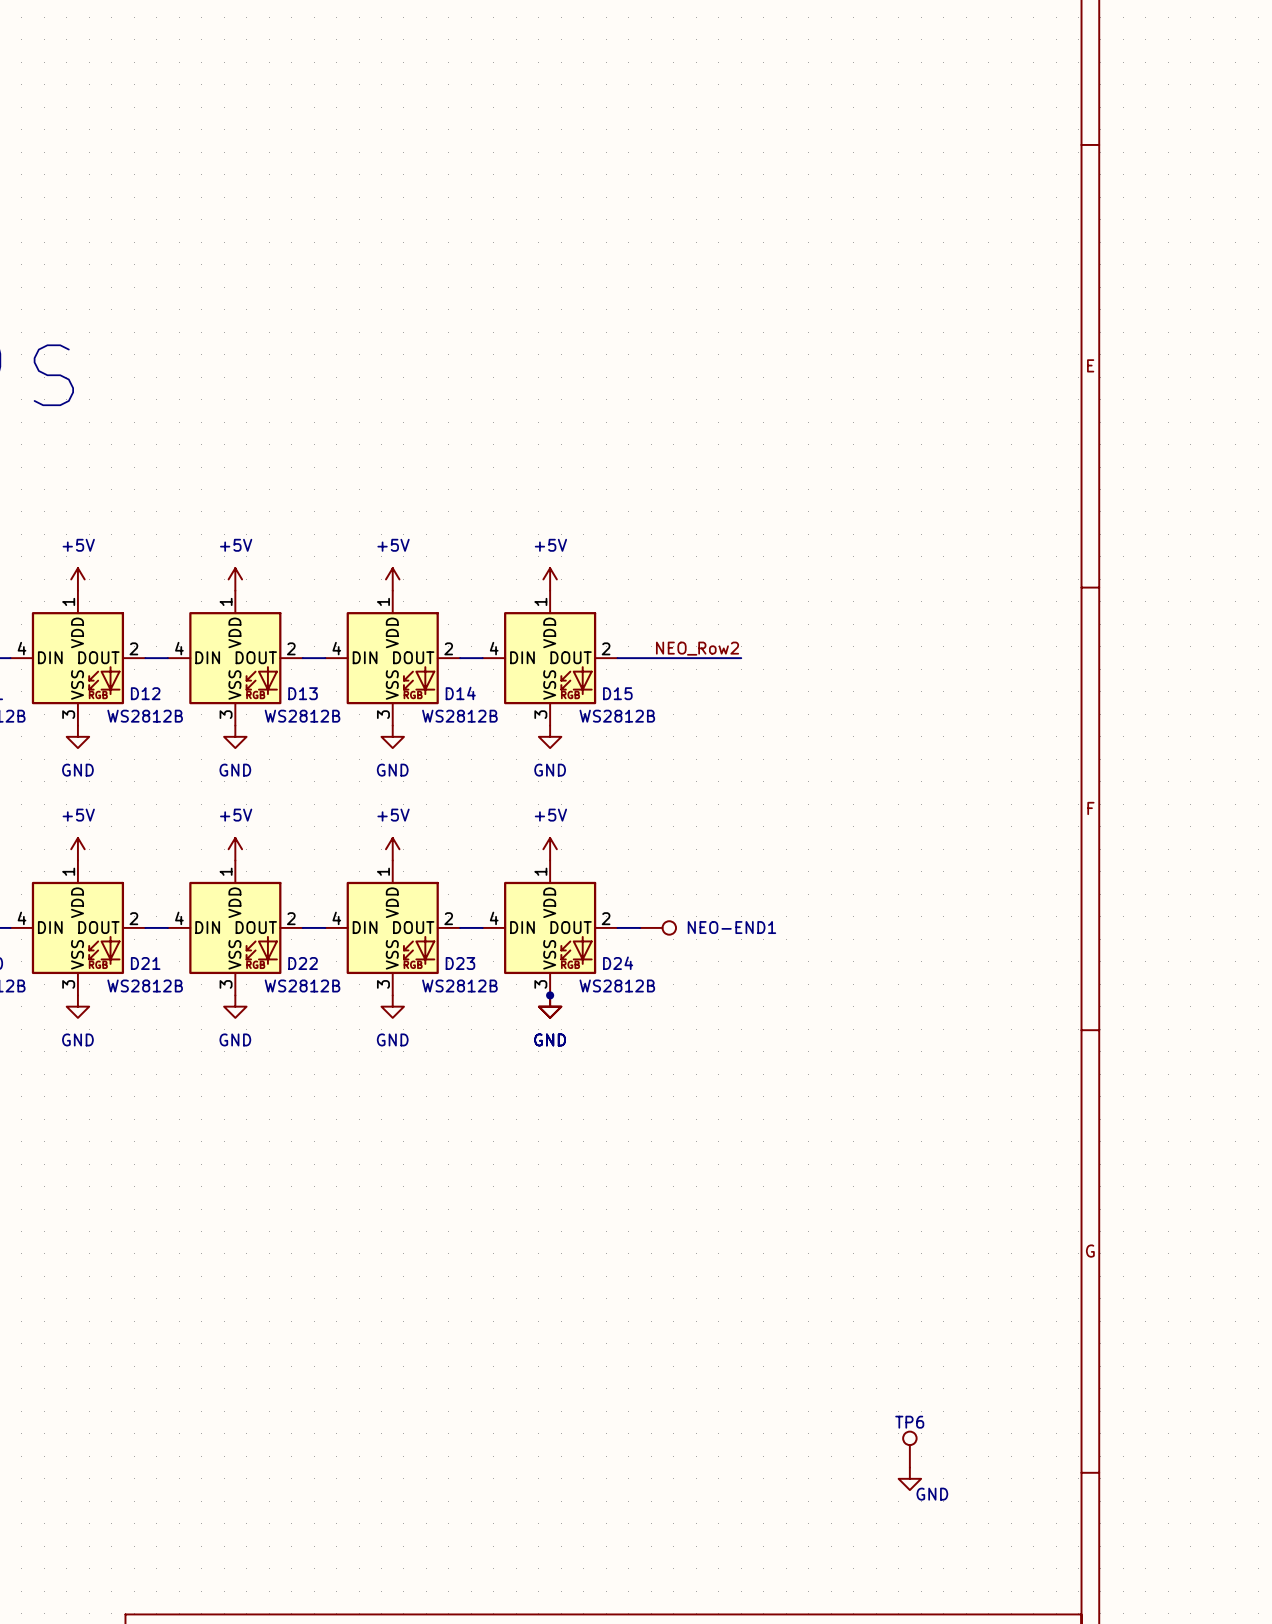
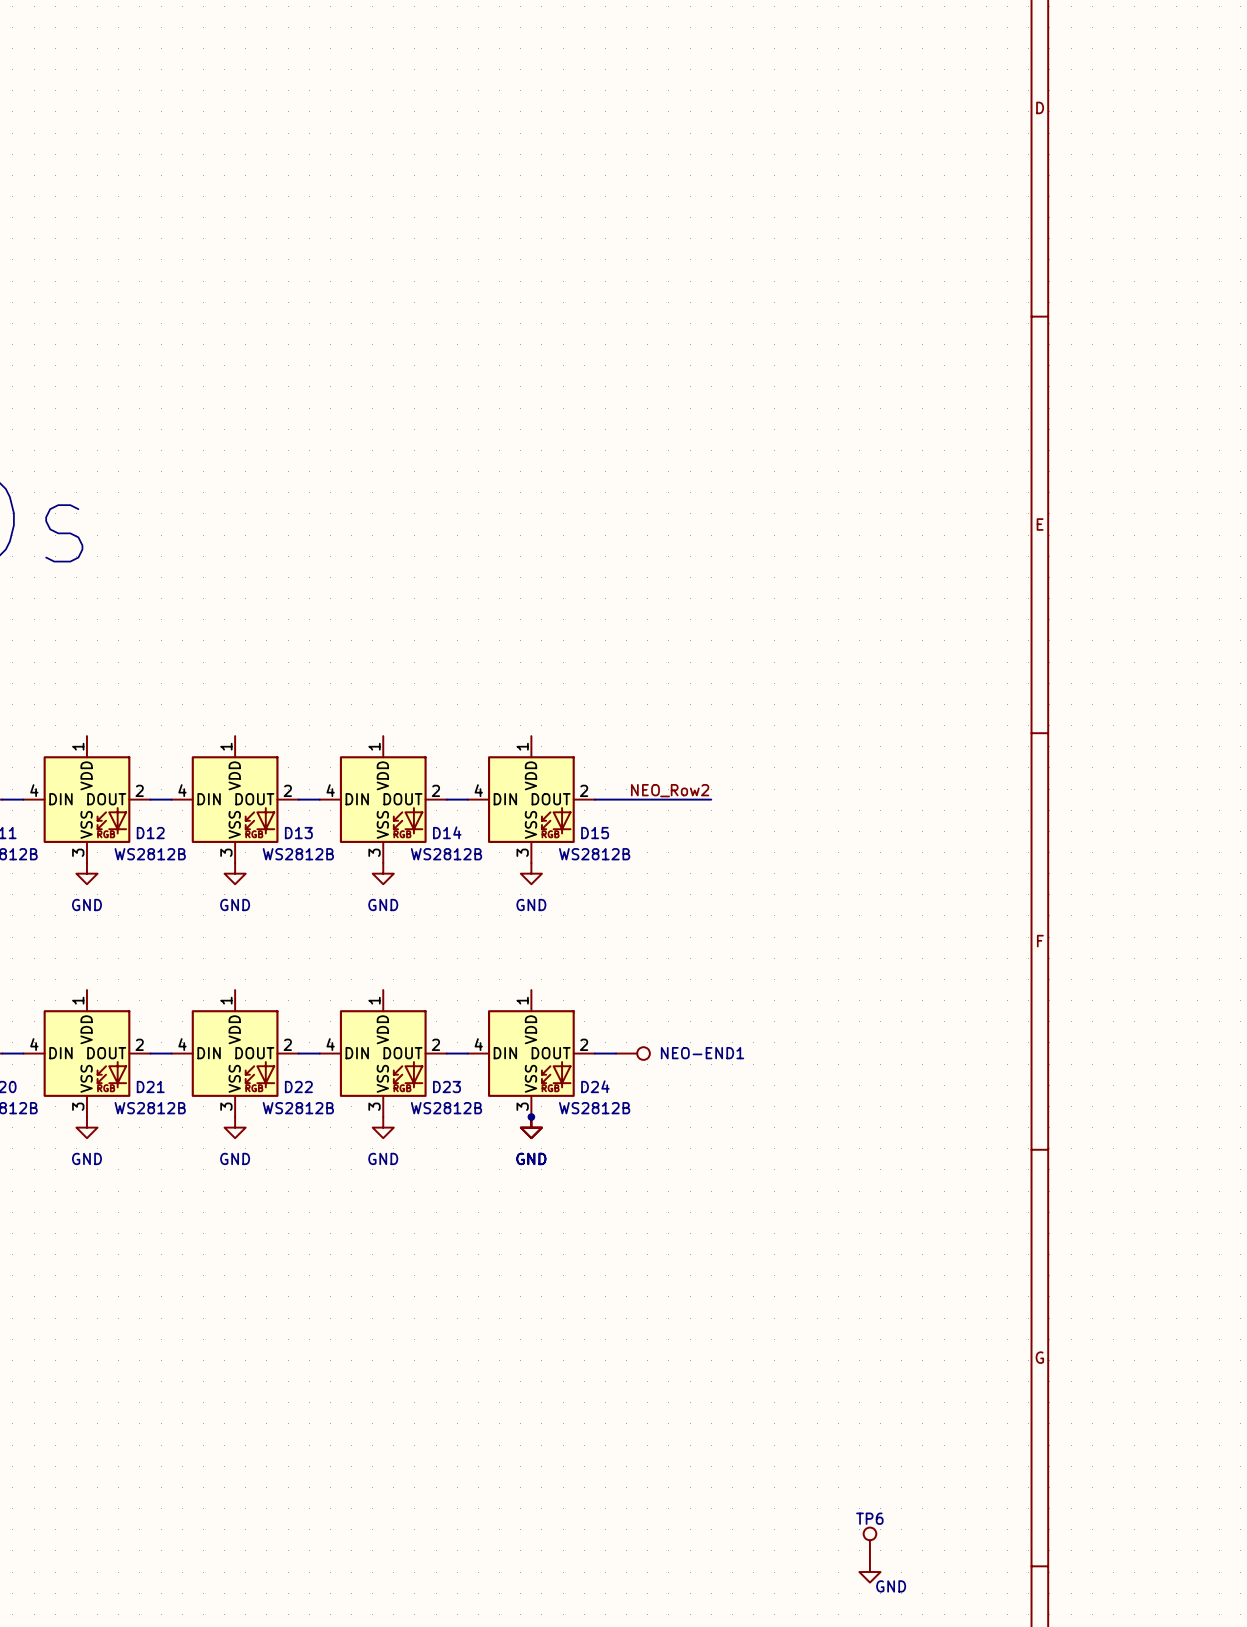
power symbol: +5V (77, 579) -> none
power symbol: +5V (235, 579) -> none
power symbol: +5V (392, 579) -> none
power symbol: +5V (550, 579) -> none
power symbol: +5V (77, 849) -> none
power symbol: +5V (235, 849) -> none
power symbol: +5V (392, 849) -> none
power symbol: +5V (550, 849) -> none

